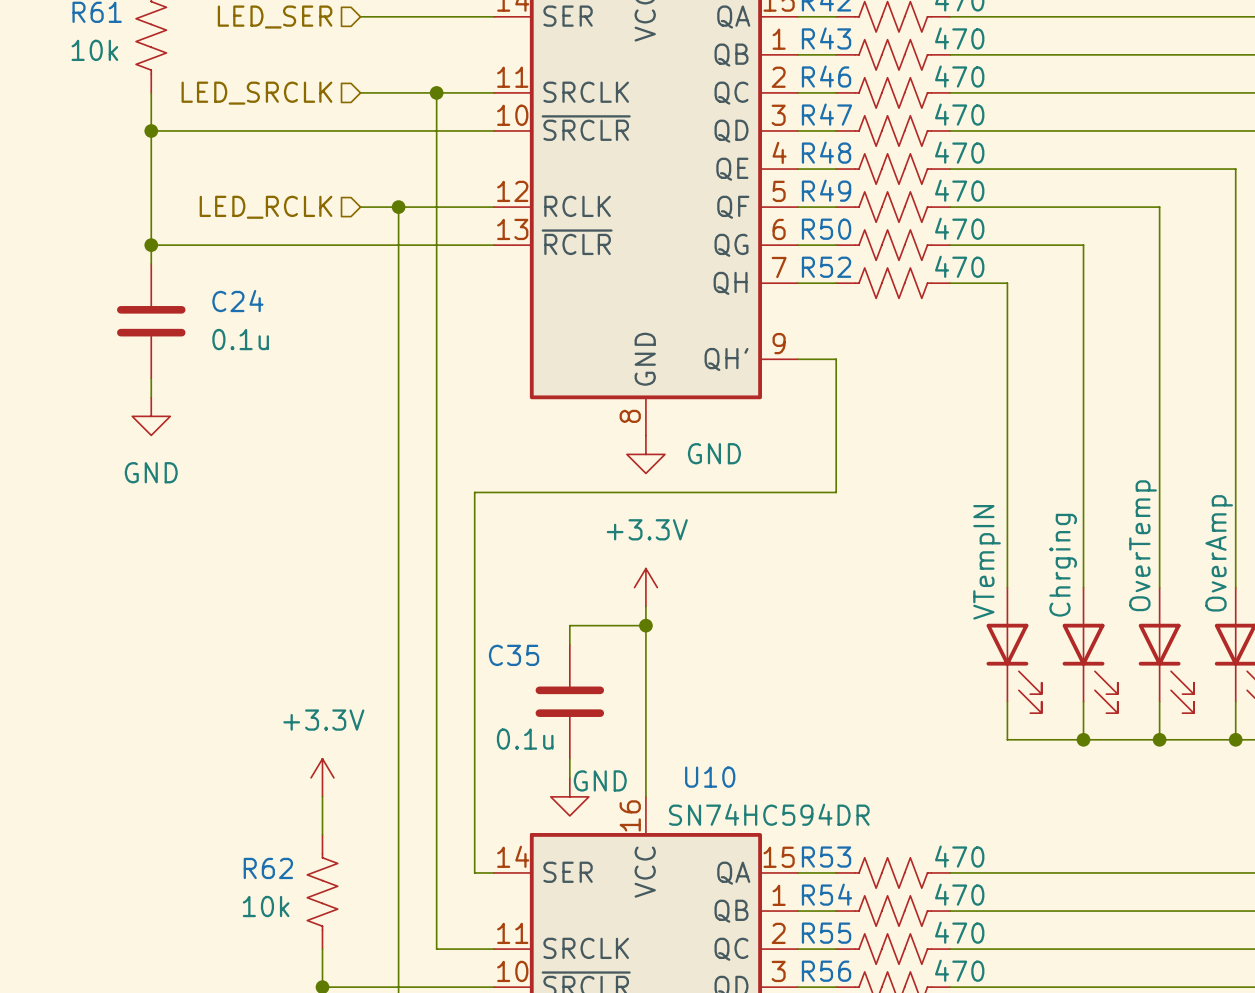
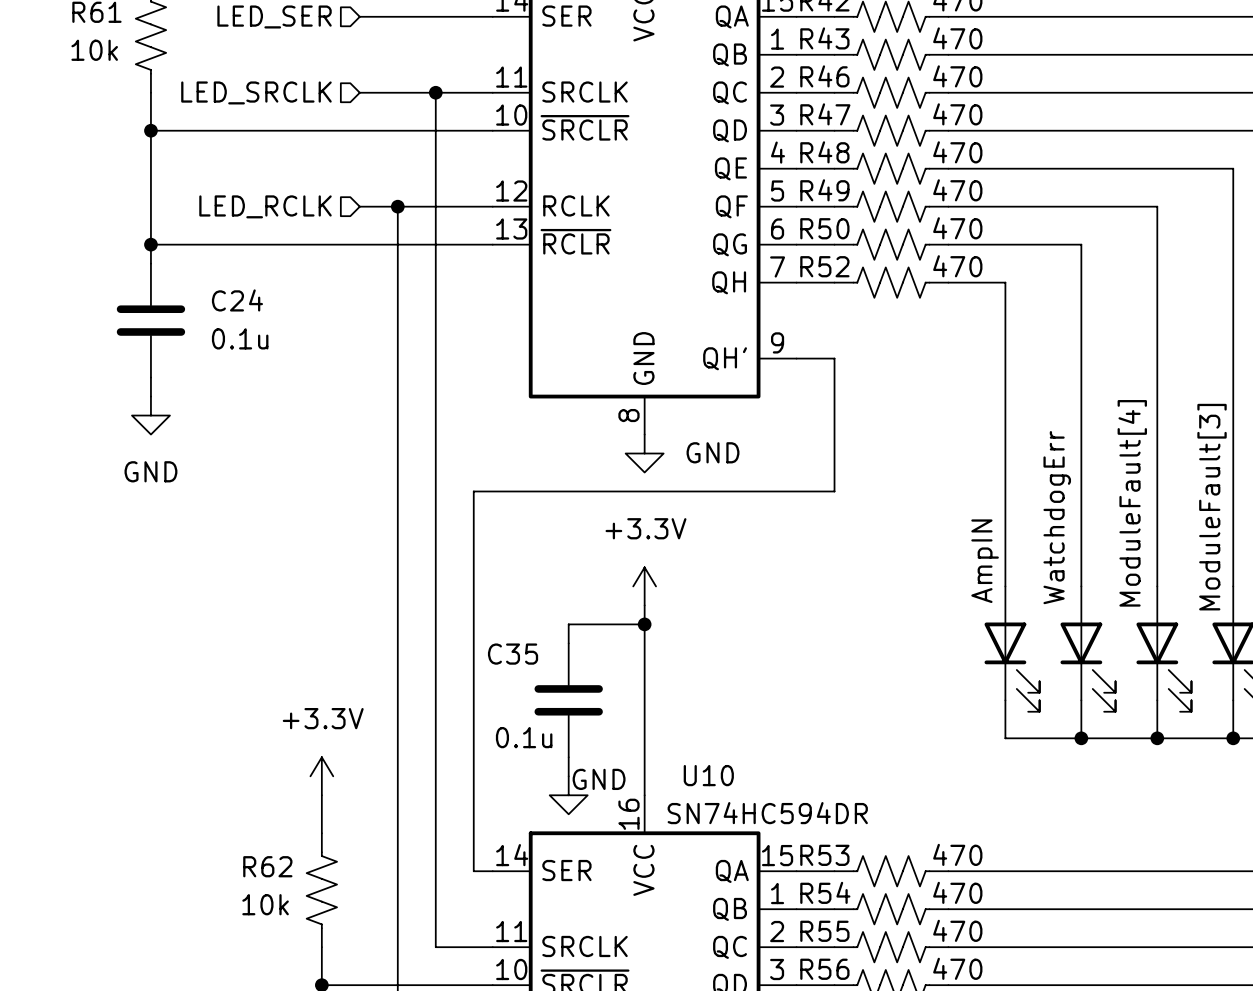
part value: OverTemp (1143, 545) -> ModuleFault[4] (1132, 503)
part value: OverAmp (1219, 553) -> ModuleFault[3] (1212, 507)
part value: VTempIN (987, 562) -> AmpIN (985, 561)
part value: Chrging (1063, 565) -> WatchdogErr (1057, 517)

